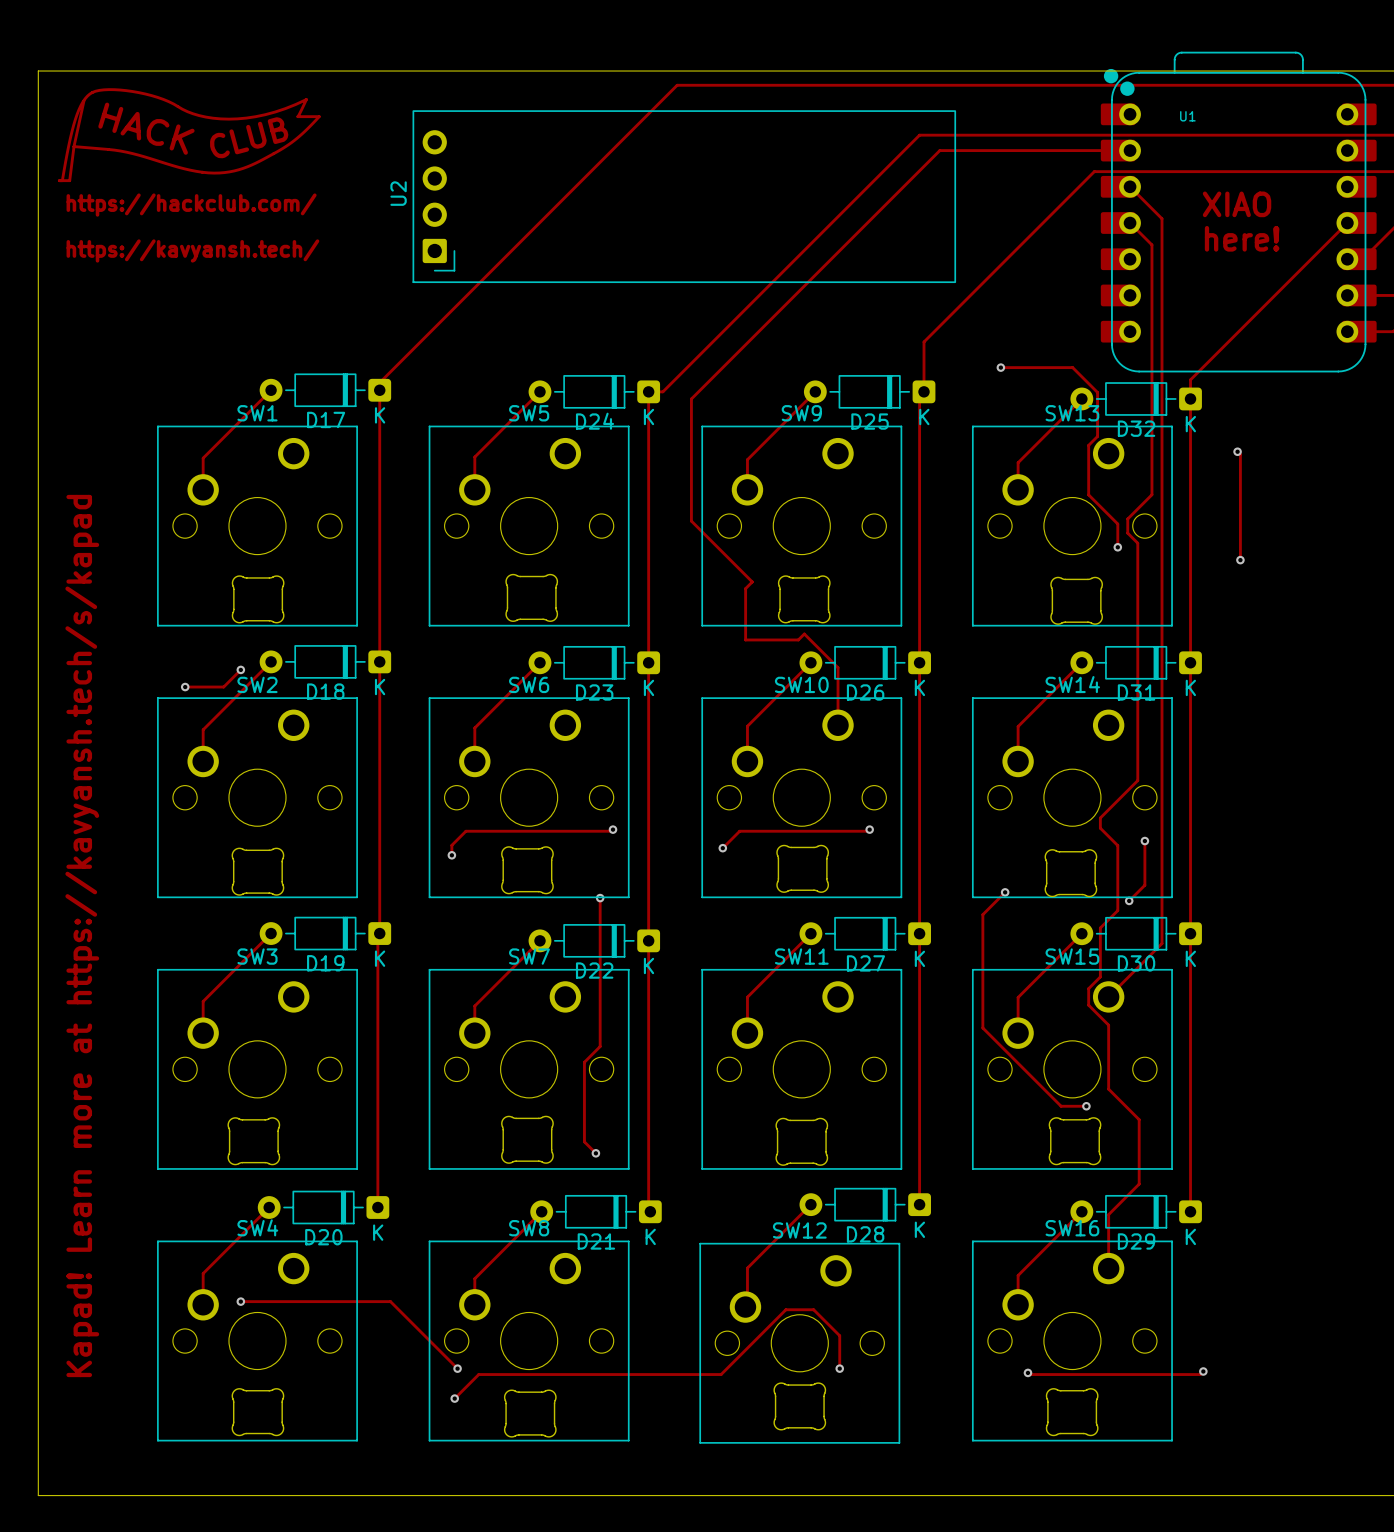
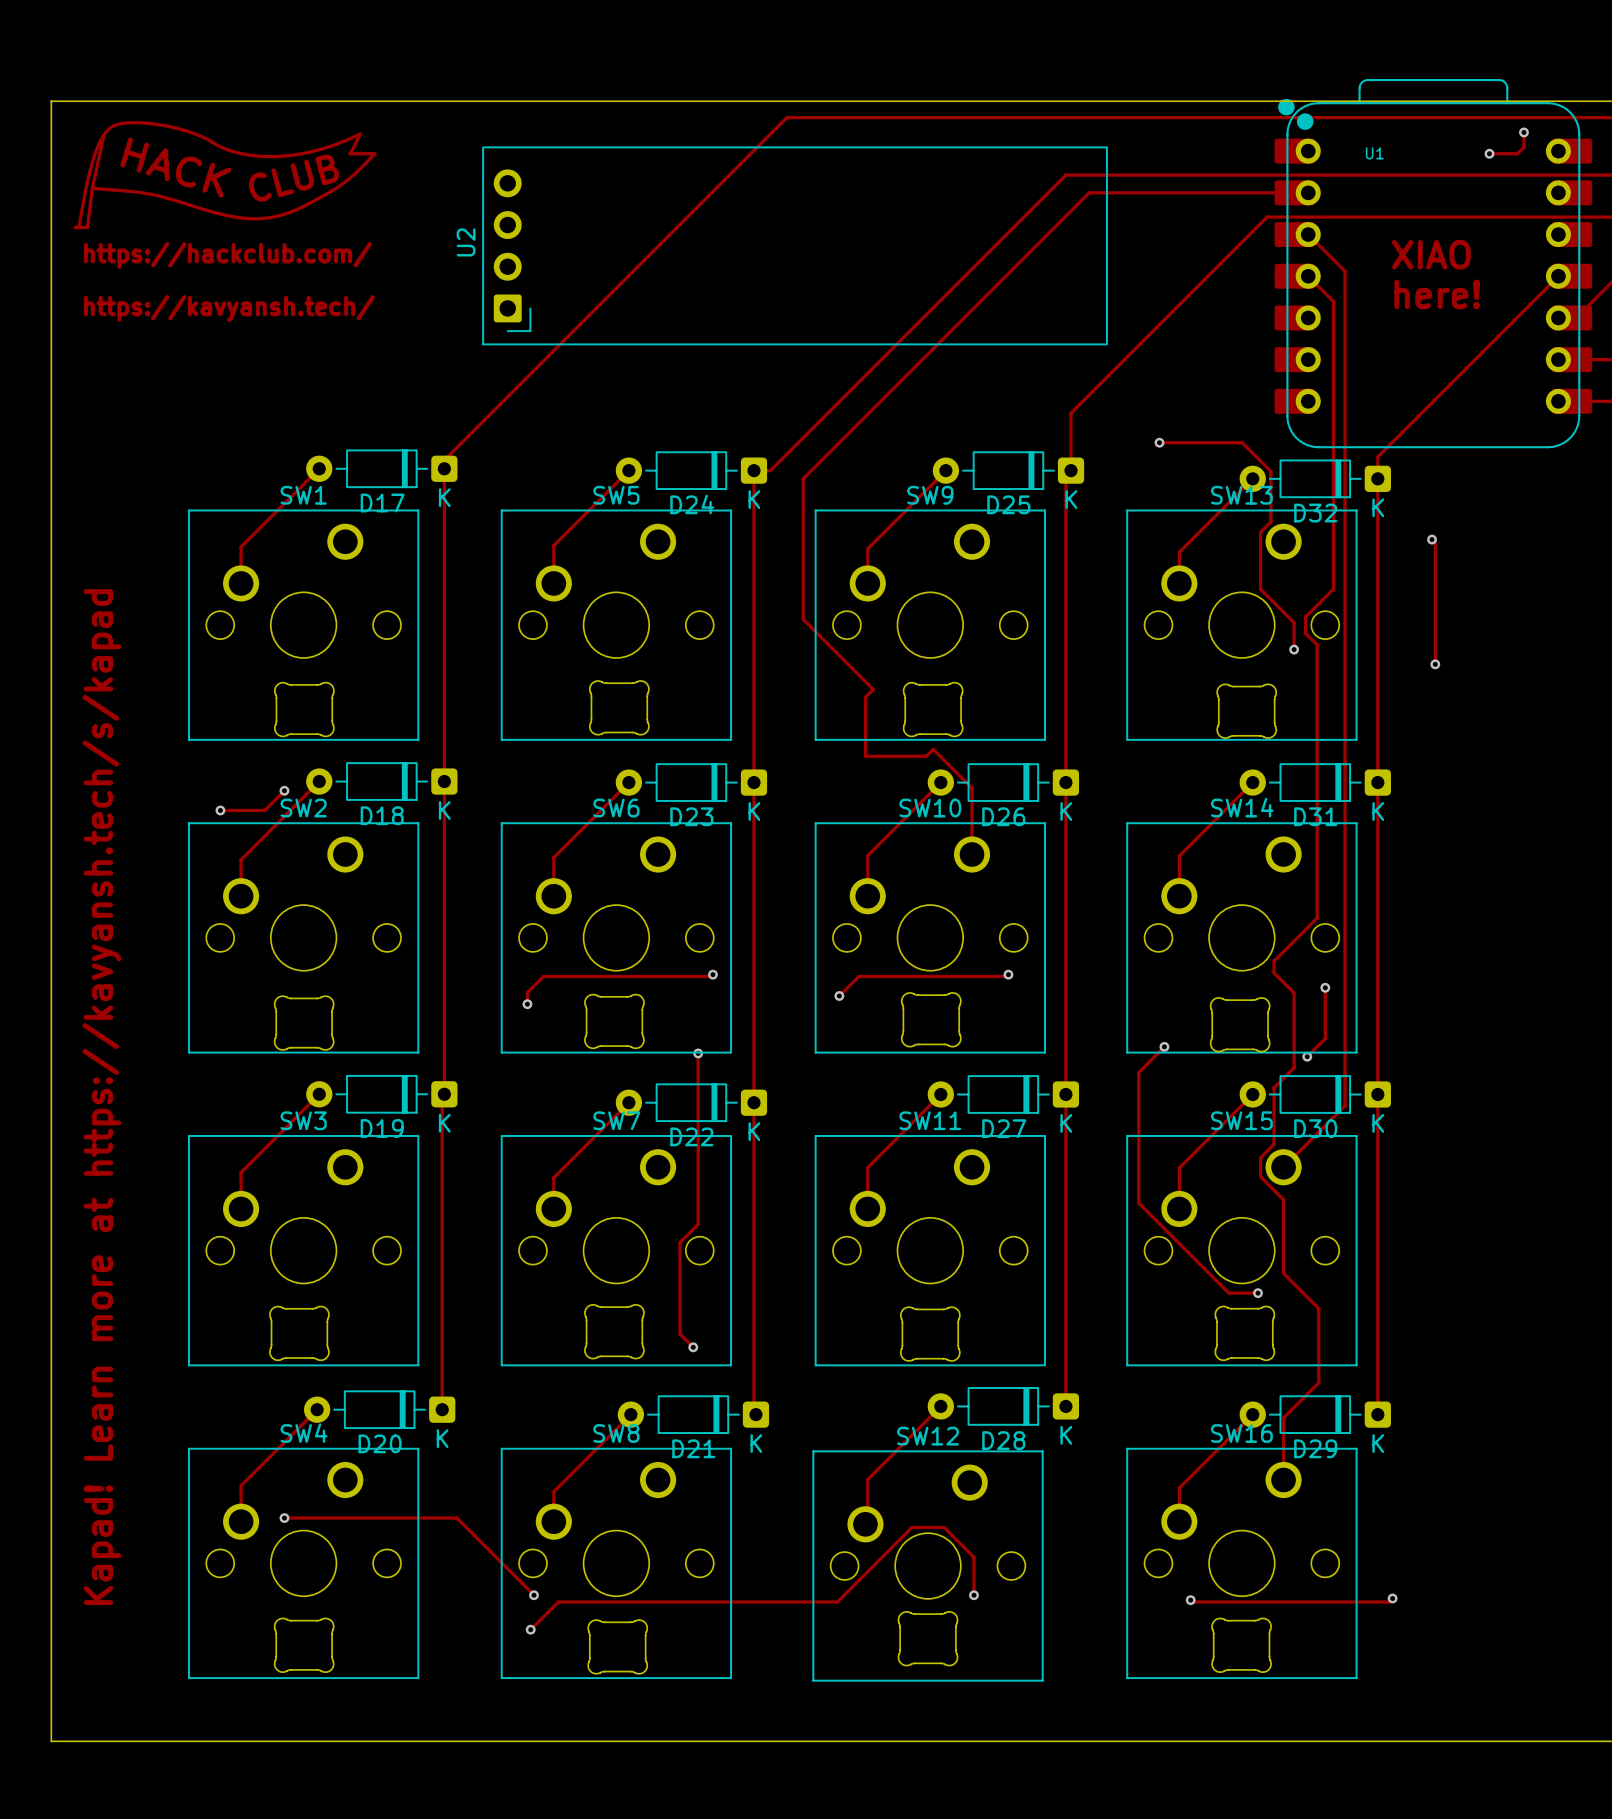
track: none -> (1523, 132) (1523, 147) (1517, 153) (1489, 153)
via: none -> (1523, 132)
via: none -> (1489, 153)

